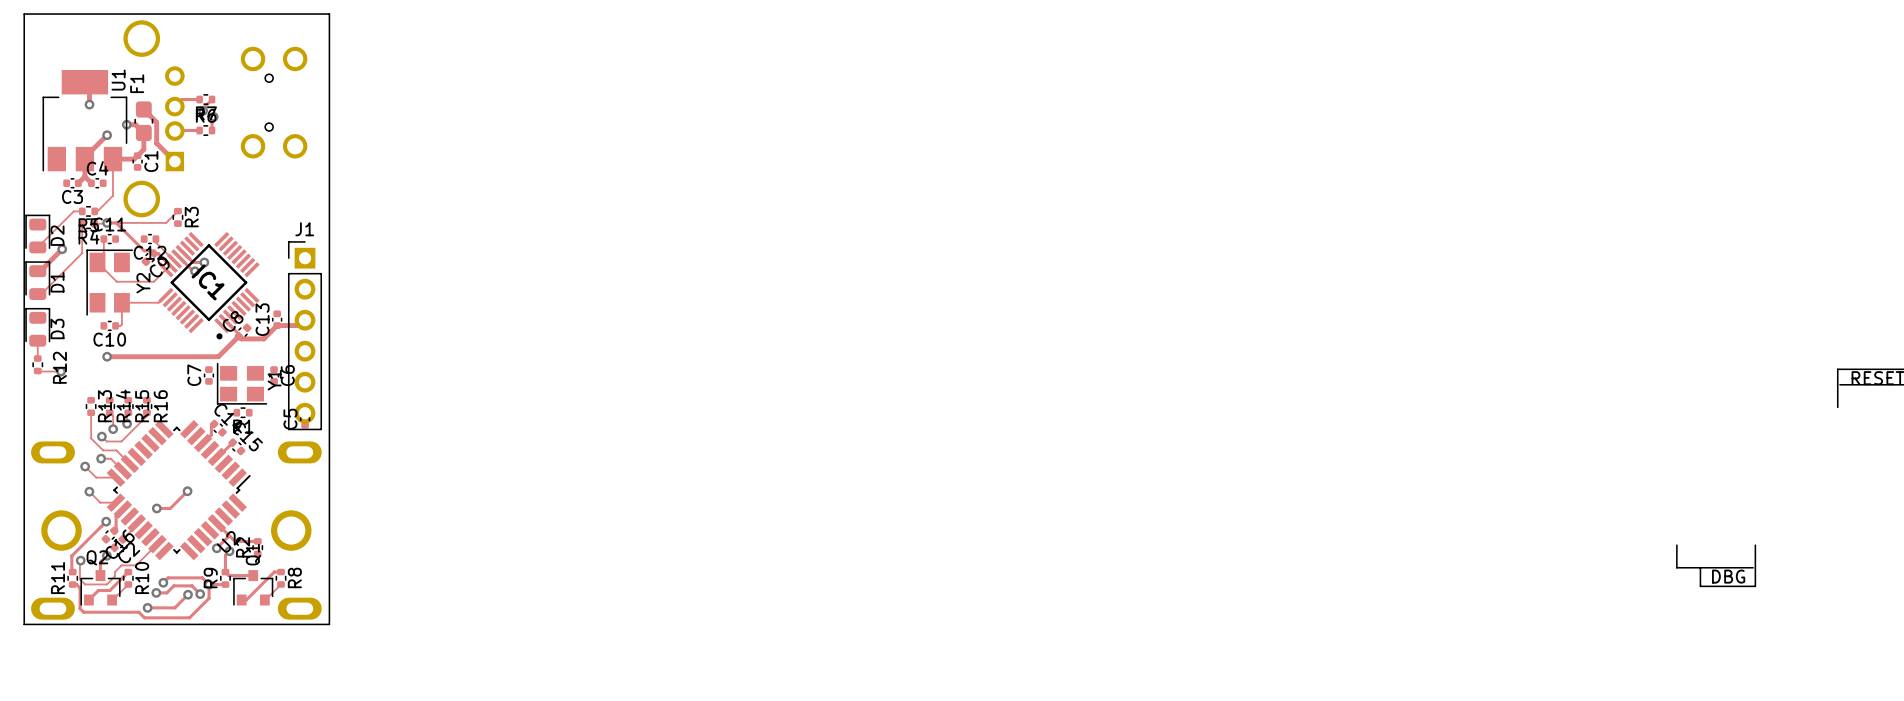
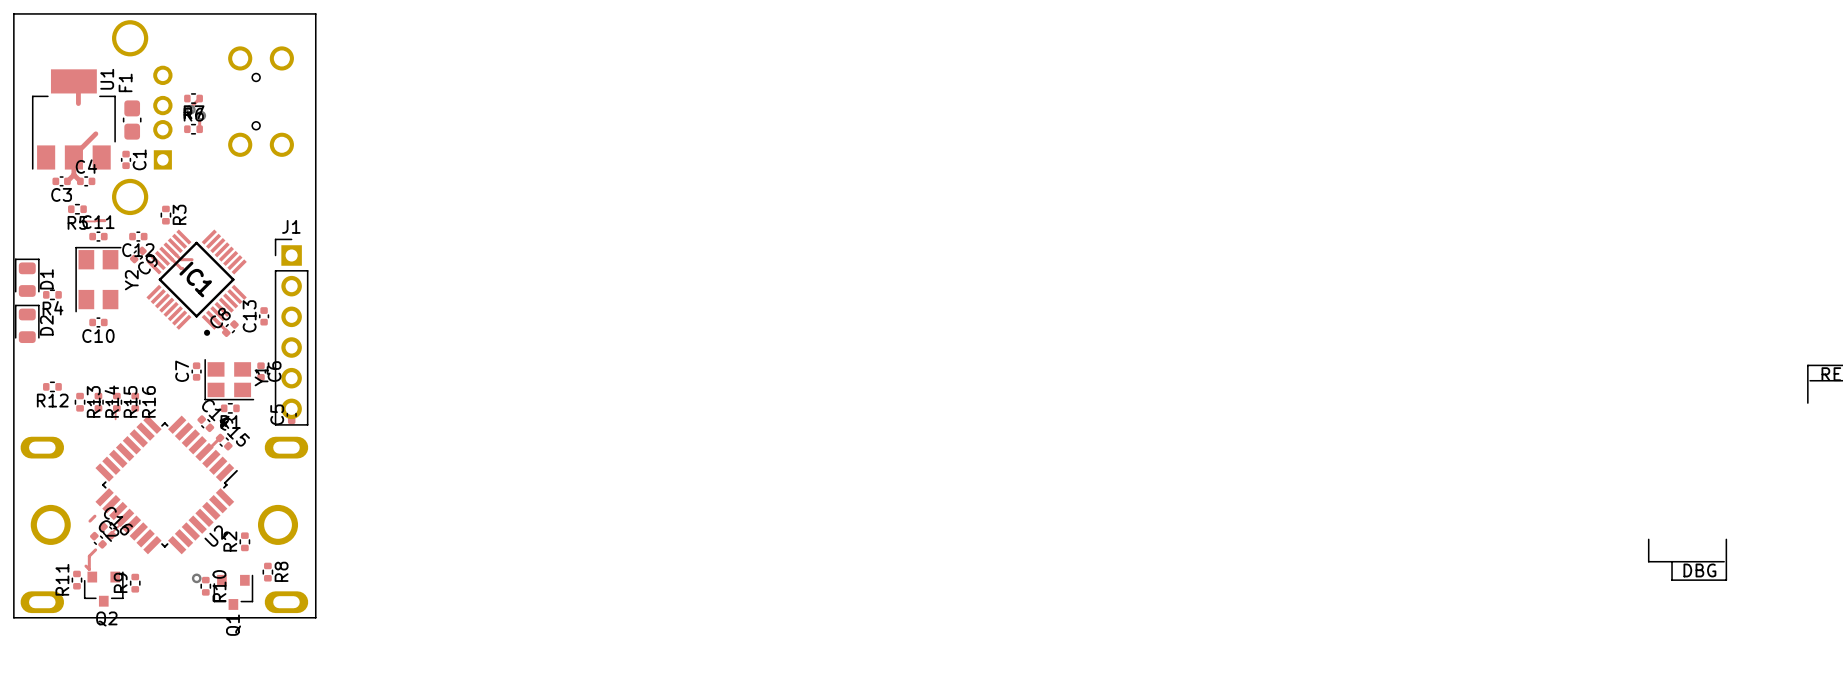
track: (199, 99) (181, 99) (174, 106) -> none
via: (89, 104) -> none
track: (143, 109) (156, 122) (156, 143) (174, 161) -> none
track: (126, 124) (135, 124) (143, 132) (143, 149) (134, 159) (112, 159) (112, 195) (97, 211) (94, 211) -> none
via: (126, 124) -> none
track: (199, 130) (174, 131) -> none
via: (107, 135) -> none
track: (82, 211) (73, 211) (37, 247) -> none
track: (177, 211) (166, 222) (116, 222) (144, 250) (158, 253) (170, 265) -> none
via: (107, 222) -> none
track: (82, 223) (82, 253) (38, 297) -> none
R4 position: (88, 223) -> (52, 294)
D2: (37, 234) -> none
track: (103, 239) (103, 256) (97, 262) (116, 281) (153, 281) (165, 269) -> none
track: (155, 239) (155, 242) (174, 261) -> none
track: (62, 249) (40, 271) (37, 271) -> none
via: (62, 249) -> none
via: (204, 262) -> none
via: (195, 271) -> none
track: (165, 295) (158, 302) (121, 302) (121, 324) (115, 325) -> none
track: (305, 320) (299, 325) (277, 325) (263, 338) (241, 338) (238, 336) (218, 356) (107, 356) -> none
D3 name: D3 (57, 328) -> D2 (46, 325)
track: (37, 340) (37, 358) -> none
via: (107, 356) -> none
R12 rotation: 0° (37, 364) -> 90° clockwise (52, 386)
R12 position: (37, 364) -> (52, 386)
track: (37, 371) (61, 371) -> none
via: (61, 371) -> none
track: (91, 412) (91, 438) (103, 450) (116, 450) (129, 463) -> none
track: (109, 412) (113, 416) (113, 429) -> none
track: (146, 412) (146, 416) (121, 441) (106, 441) (101, 436) -> none
via: (127, 423) -> none
track: (214, 424) (211, 426) (211, 434) (203, 443) -> none
via: (113, 429) -> none
via: (101, 436) -> none
track: (101, 458) (110, 458) (122, 470) -> none
via: (101, 458) -> none
track: (85, 466) (96, 477) (115, 477) -> none
via: (85, 466) -> none
track: (89, 491) (100, 502) (115, 502) -> none
via: (89, 491) -> none
track: (187, 491) (170, 508) (156, 508) -> none
via: (187, 491) -> none
via: (156, 508) -> none
track: (122, 509) (116, 516) (116, 529) (114, 530) -> none
via: (106, 521) -> none
track: (216, 523) (234, 541) (257, 541) -> none
track: (101, 526) (71, 555) (72, 572) -> none
track: (227, 534) (227, 537) (216, 548) -> none
C16 rotation: 0° (110, 535) -> 90° clockwise (107, 531)
C2 rotation: 0° (118, 543) -> 90° clockwise (98, 540)
track: (157, 544) (136, 565) (121, 565) (106, 584) (85, 584) (79, 579) -> none
via: (216, 548) -> none
track: (229, 551) (225, 555) (225, 572) (228, 575) (253, 575) -> none
via: (229, 551) -> none
via: (106, 555) -> none
track: (80, 560) (79, 579) -> none
via: (80, 560) -> none
track: (128, 572) (109, 590) (98, 590) (88, 600) -> none
track: (281, 572) (274, 572) (246, 600) (241, 600) -> none
R11 position: (72, 578) -> (76, 580)
R10 position: (128, 578) -> (205, 586)
R9 position: (225, 578) -> (135, 583)
track: (163, 582) (168, 577) (202, 577) (209, 584) (209, 598) (189, 617) (144, 617) (138, 612) (83, 612) (80, 608) (80, 588) (76, 584) (72, 584) -> none
via: (163, 582) -> none
track: (128, 584) (112, 600) -> none
track: (209, 584) (225, 584) -> none
track: (281, 584) (264, 600) -> none
Q2 rotation: 0° (100, 587) -> 180° (103, 589)
Q1 rotation: 0° (253, 587) -> 180° (233, 592)
track: (156, 592) (166, 592) (173, 585) (191, 585) (200, 594) -> none
via: (156, 592) -> none
track: (188, 594) (174, 607) (147, 607) -> none
via: (188, 594) -> none
via: (200, 594) -> none
via: (147, 607) -> none

